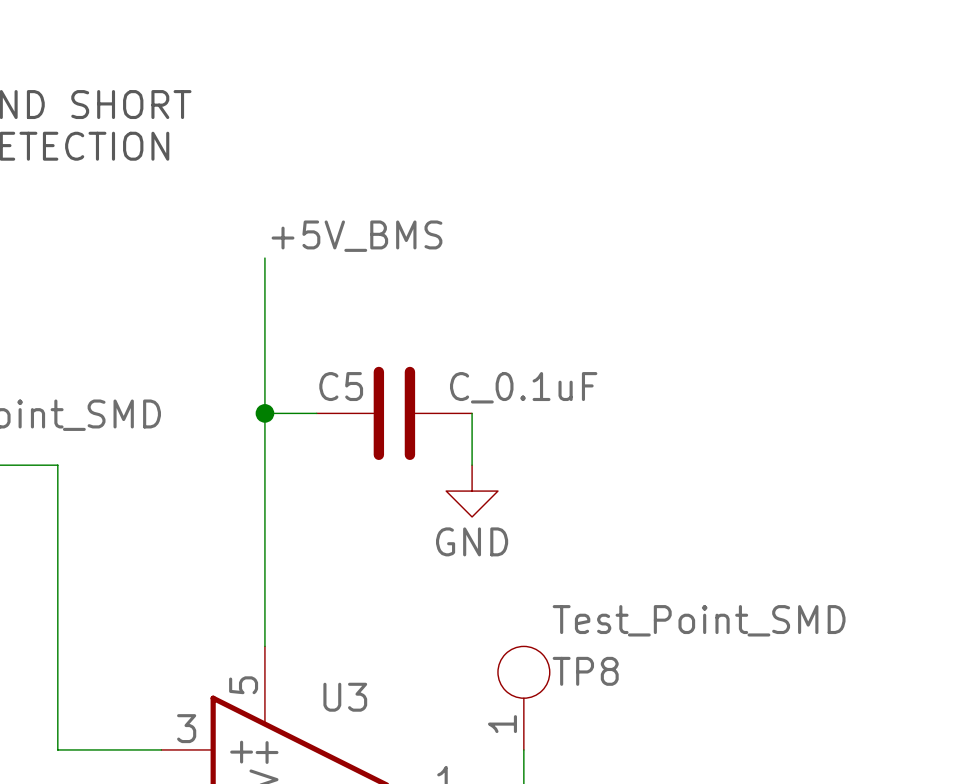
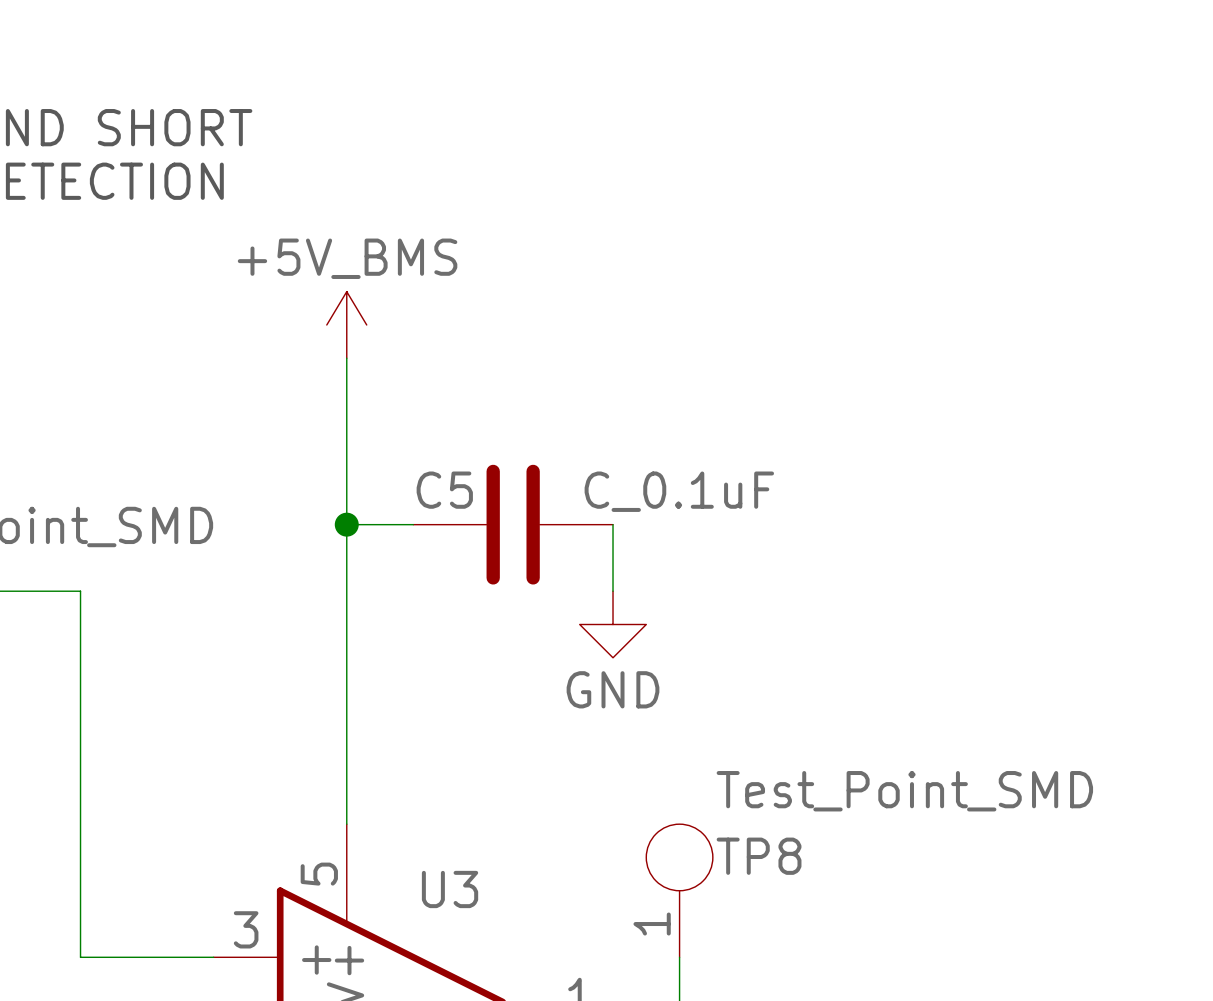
label: +5V_BMS (356, 236) -> none
power symbol: none -> +5V_BMS (346, 324)

